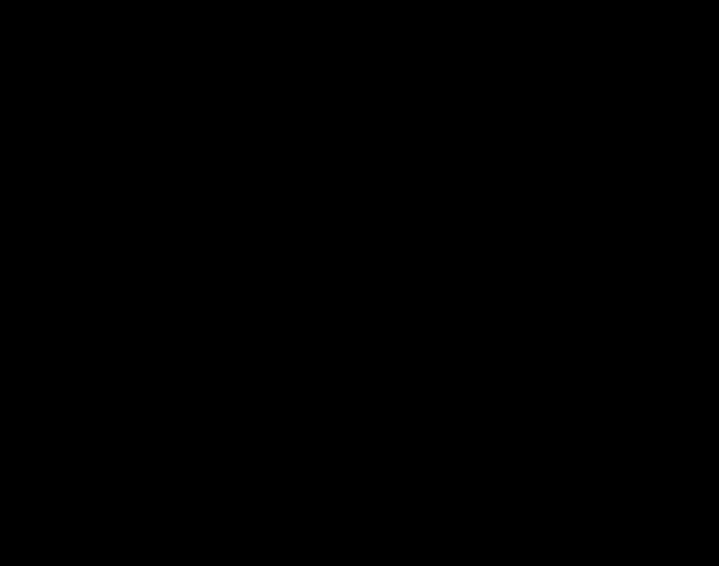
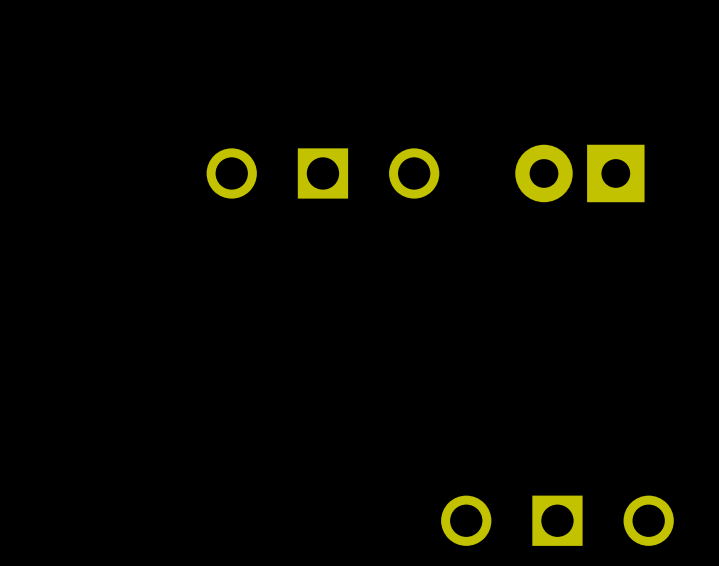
part: none -> (322, 173)
part: none -> (579, 173)
part: none -> (557, 520)

